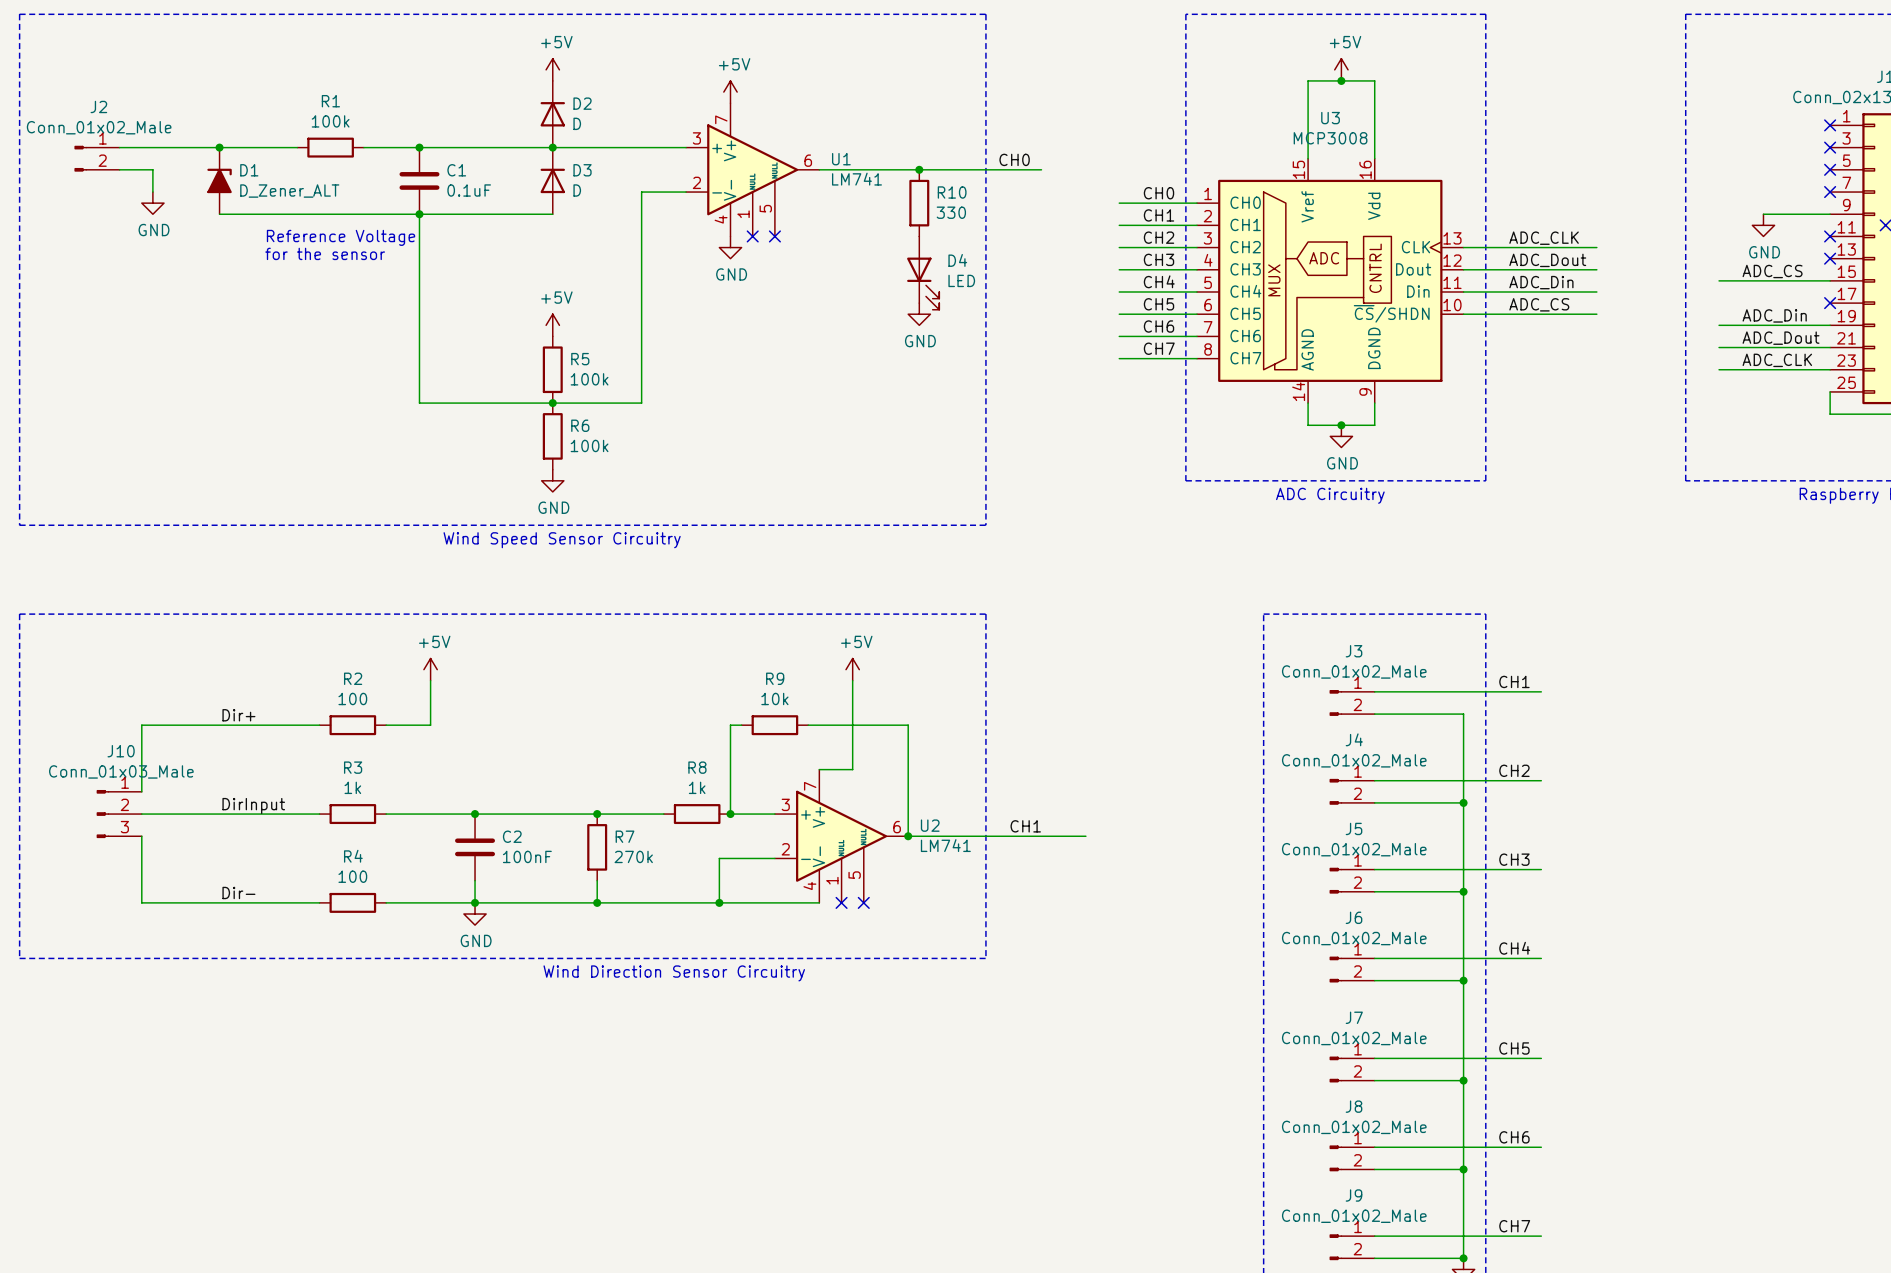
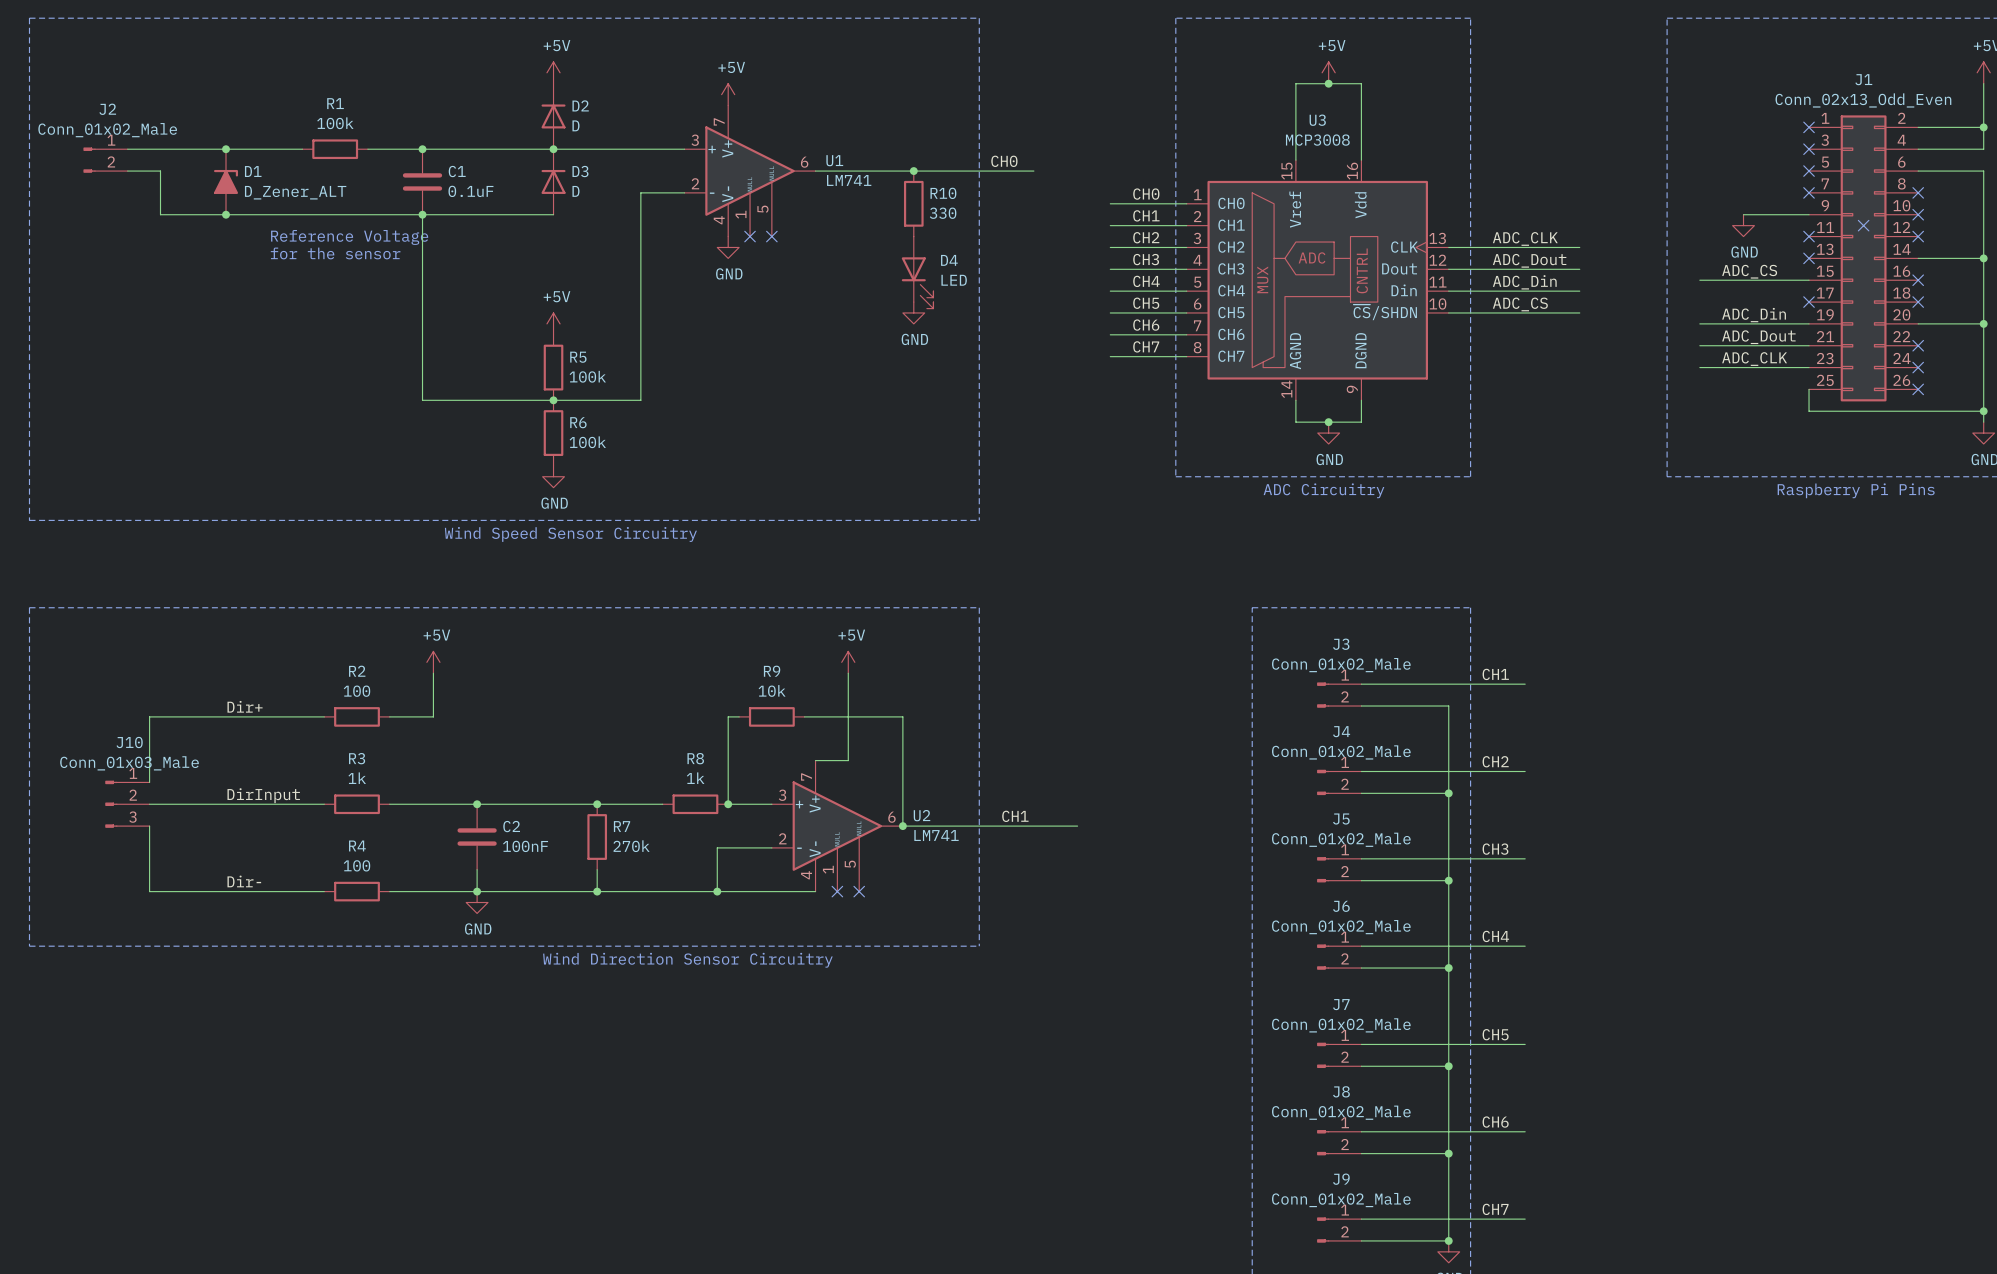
wire: none -> (160, 192) (160, 214) (226, 214)
power symbol: GND (152, 203) -> none
junction: none -> (226, 214)

